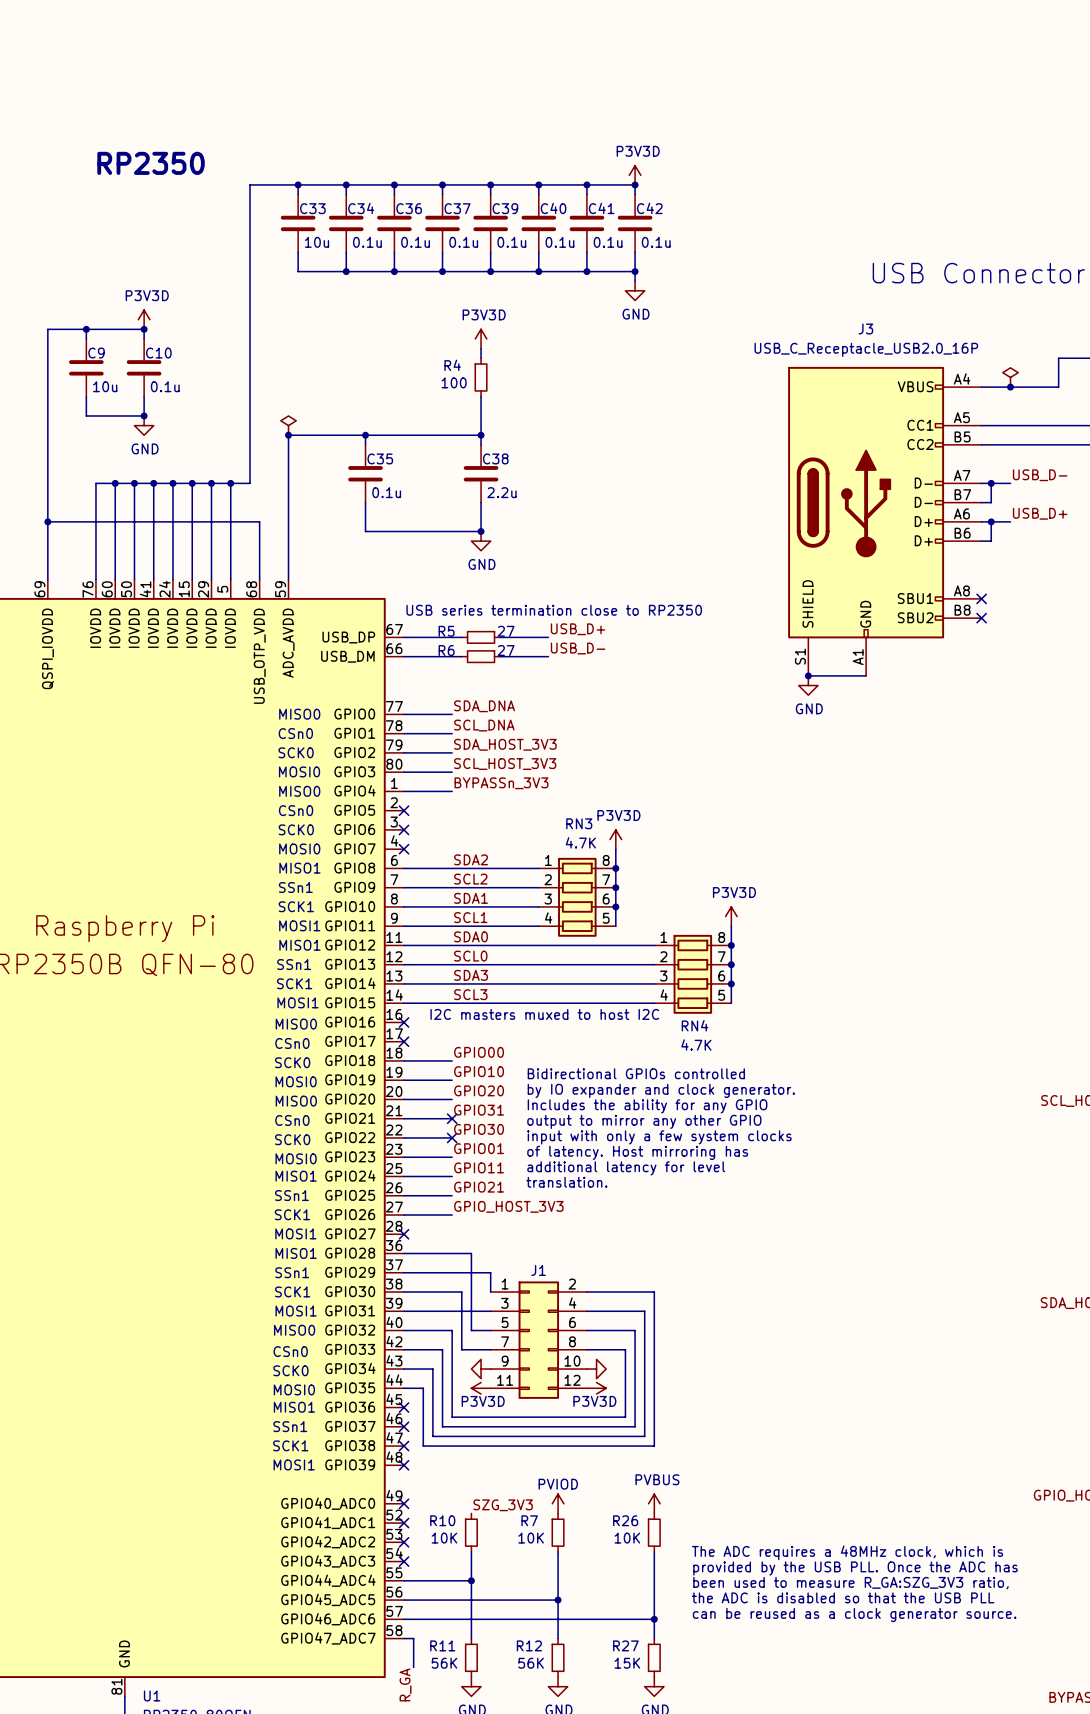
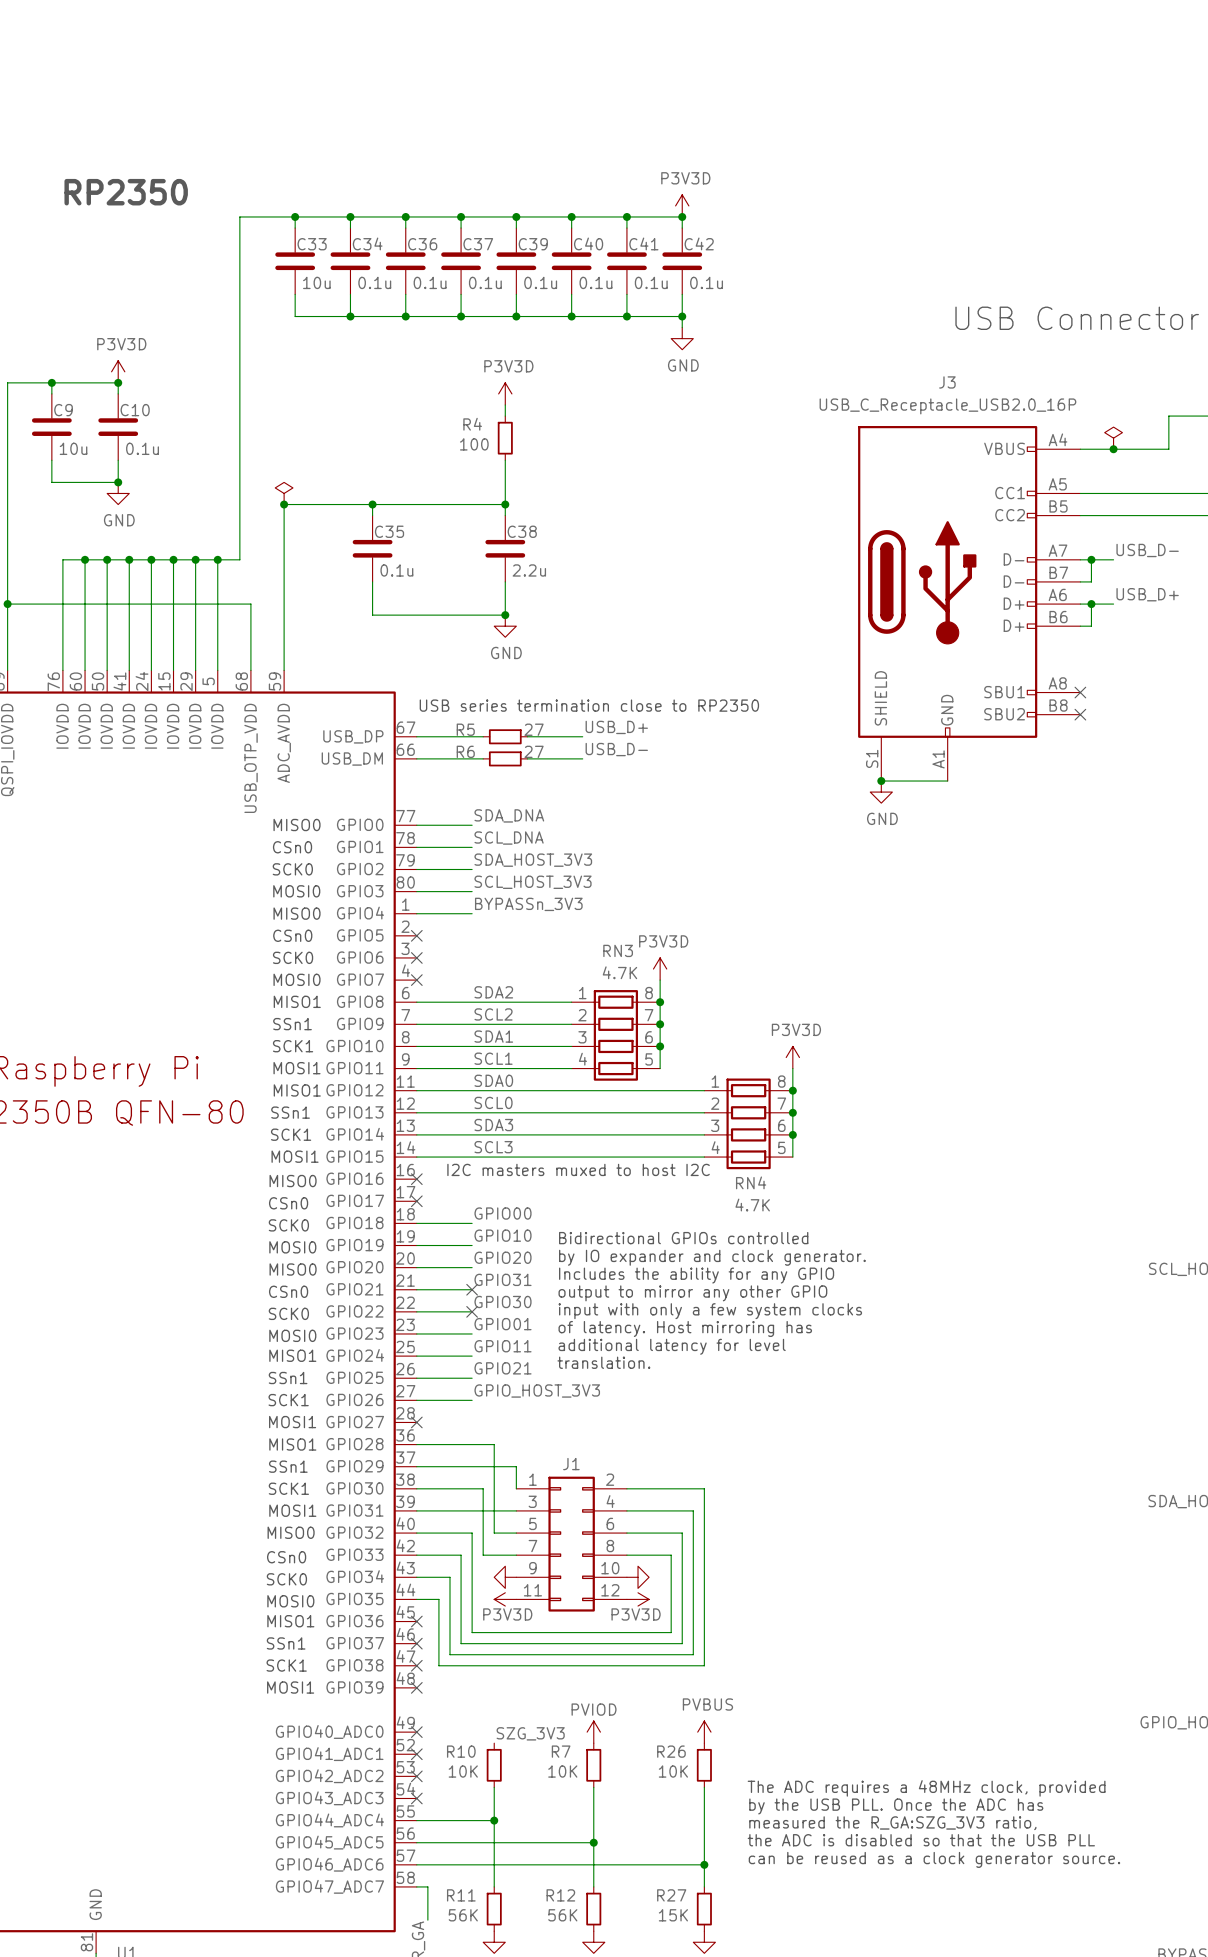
text: The ADC requires a 48MHz clock, which is (847, 1552) -> The ADC requires a 48MHz clock, provided (926, 1788)
text: provided by the USB PLL. Once the ADC has (855, 1568) -> by the USB PLL. Once the ADC has (896, 1806)
text: been used to measure R_GA:SZG_3V3 ratio, (850, 1583) -> measured the R_GA:SZG_3V3 ratio, (892, 1823)

